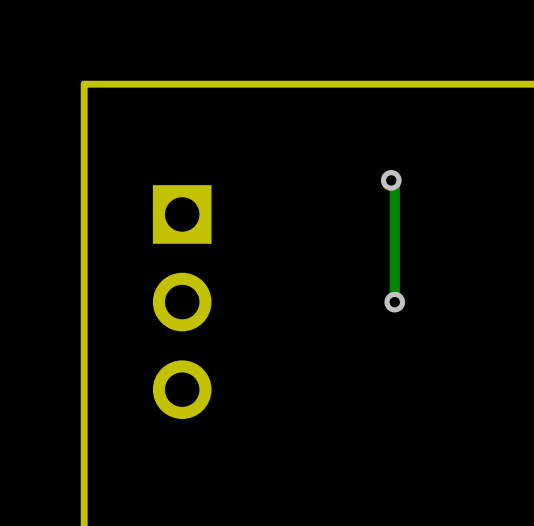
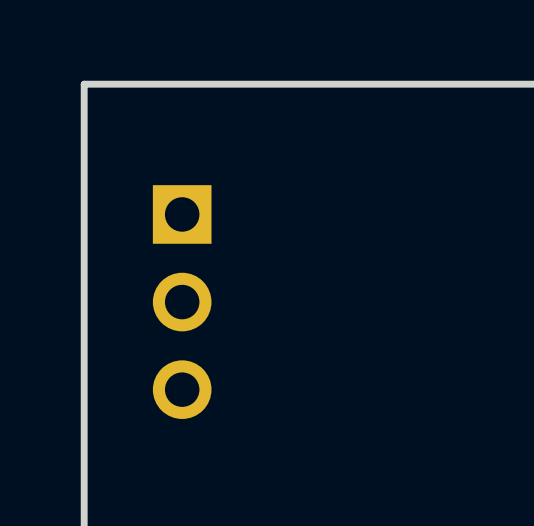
track: (391, 180) (394, 183) (394, 302) -> none
via: (391, 180) -> none
via: (394, 302) -> none

